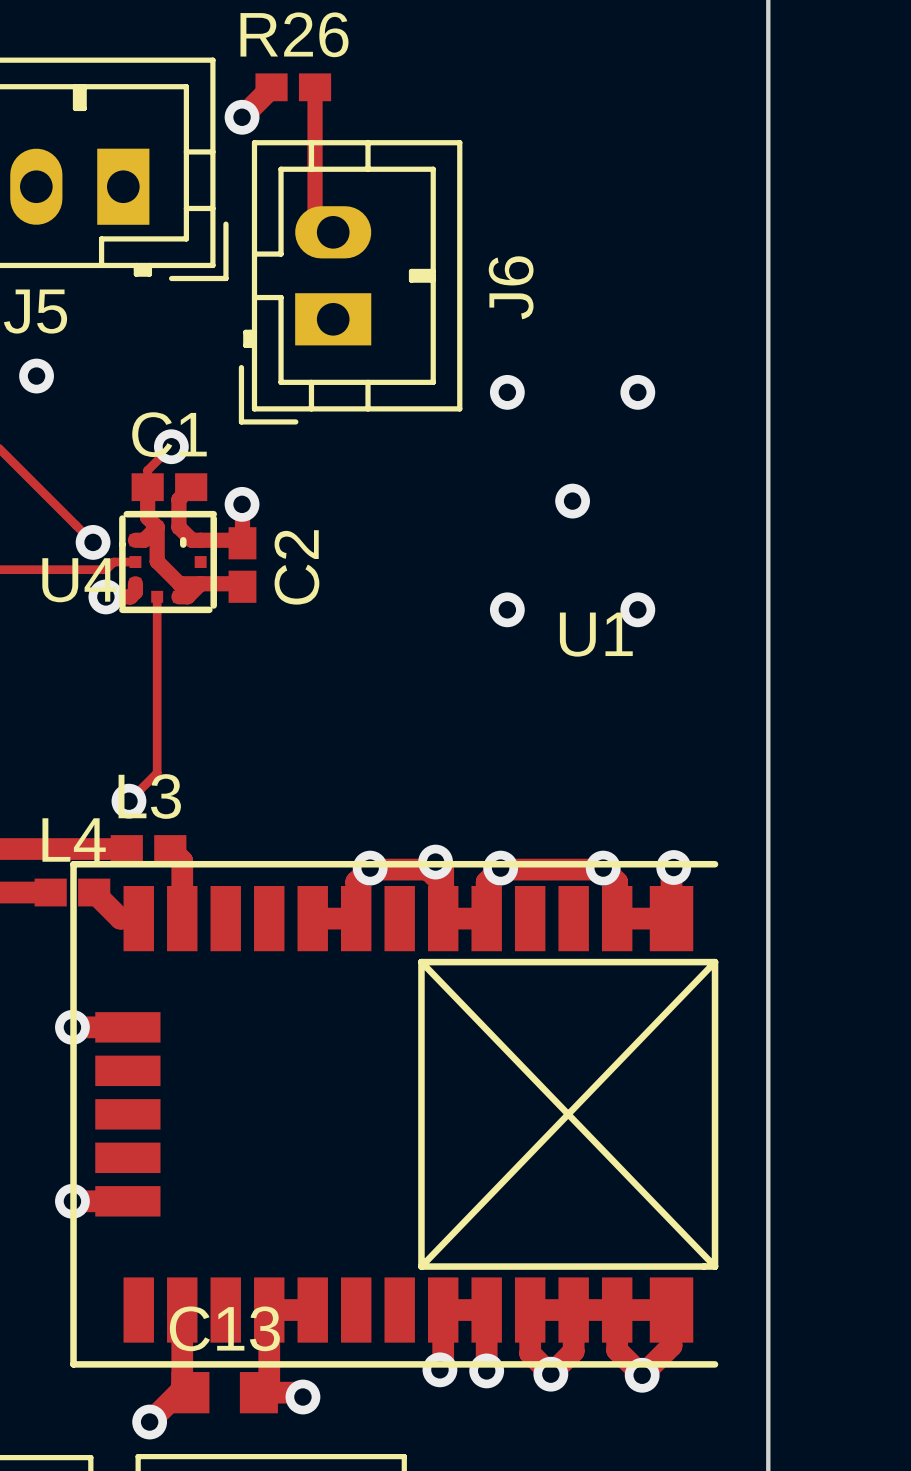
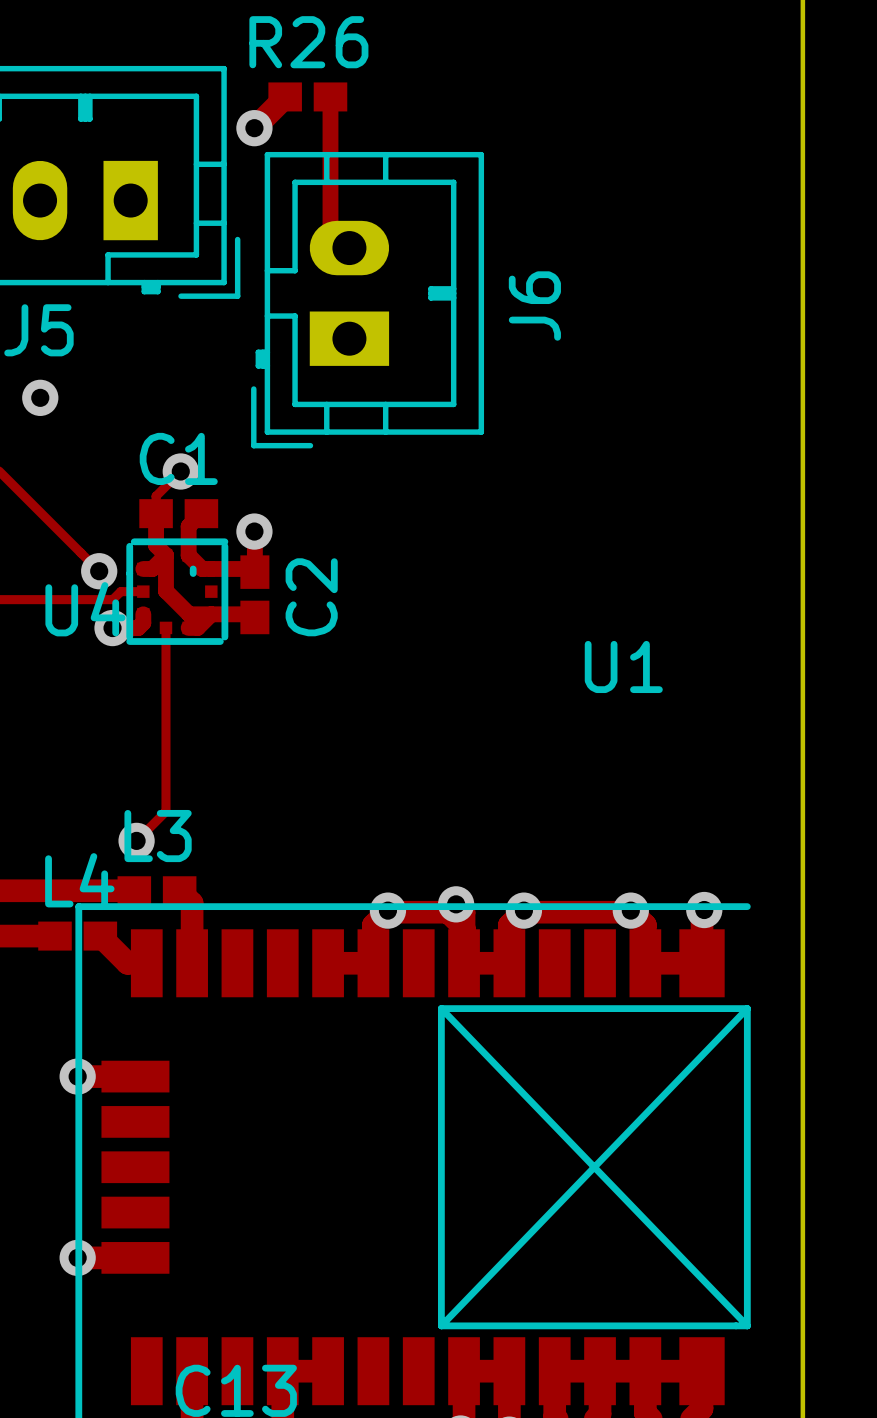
via: (507, 392) -> none
via: (637, 392) -> none
via: (572, 501) -> none
via: (507, 609) -> none
via: (637, 609) -> none

